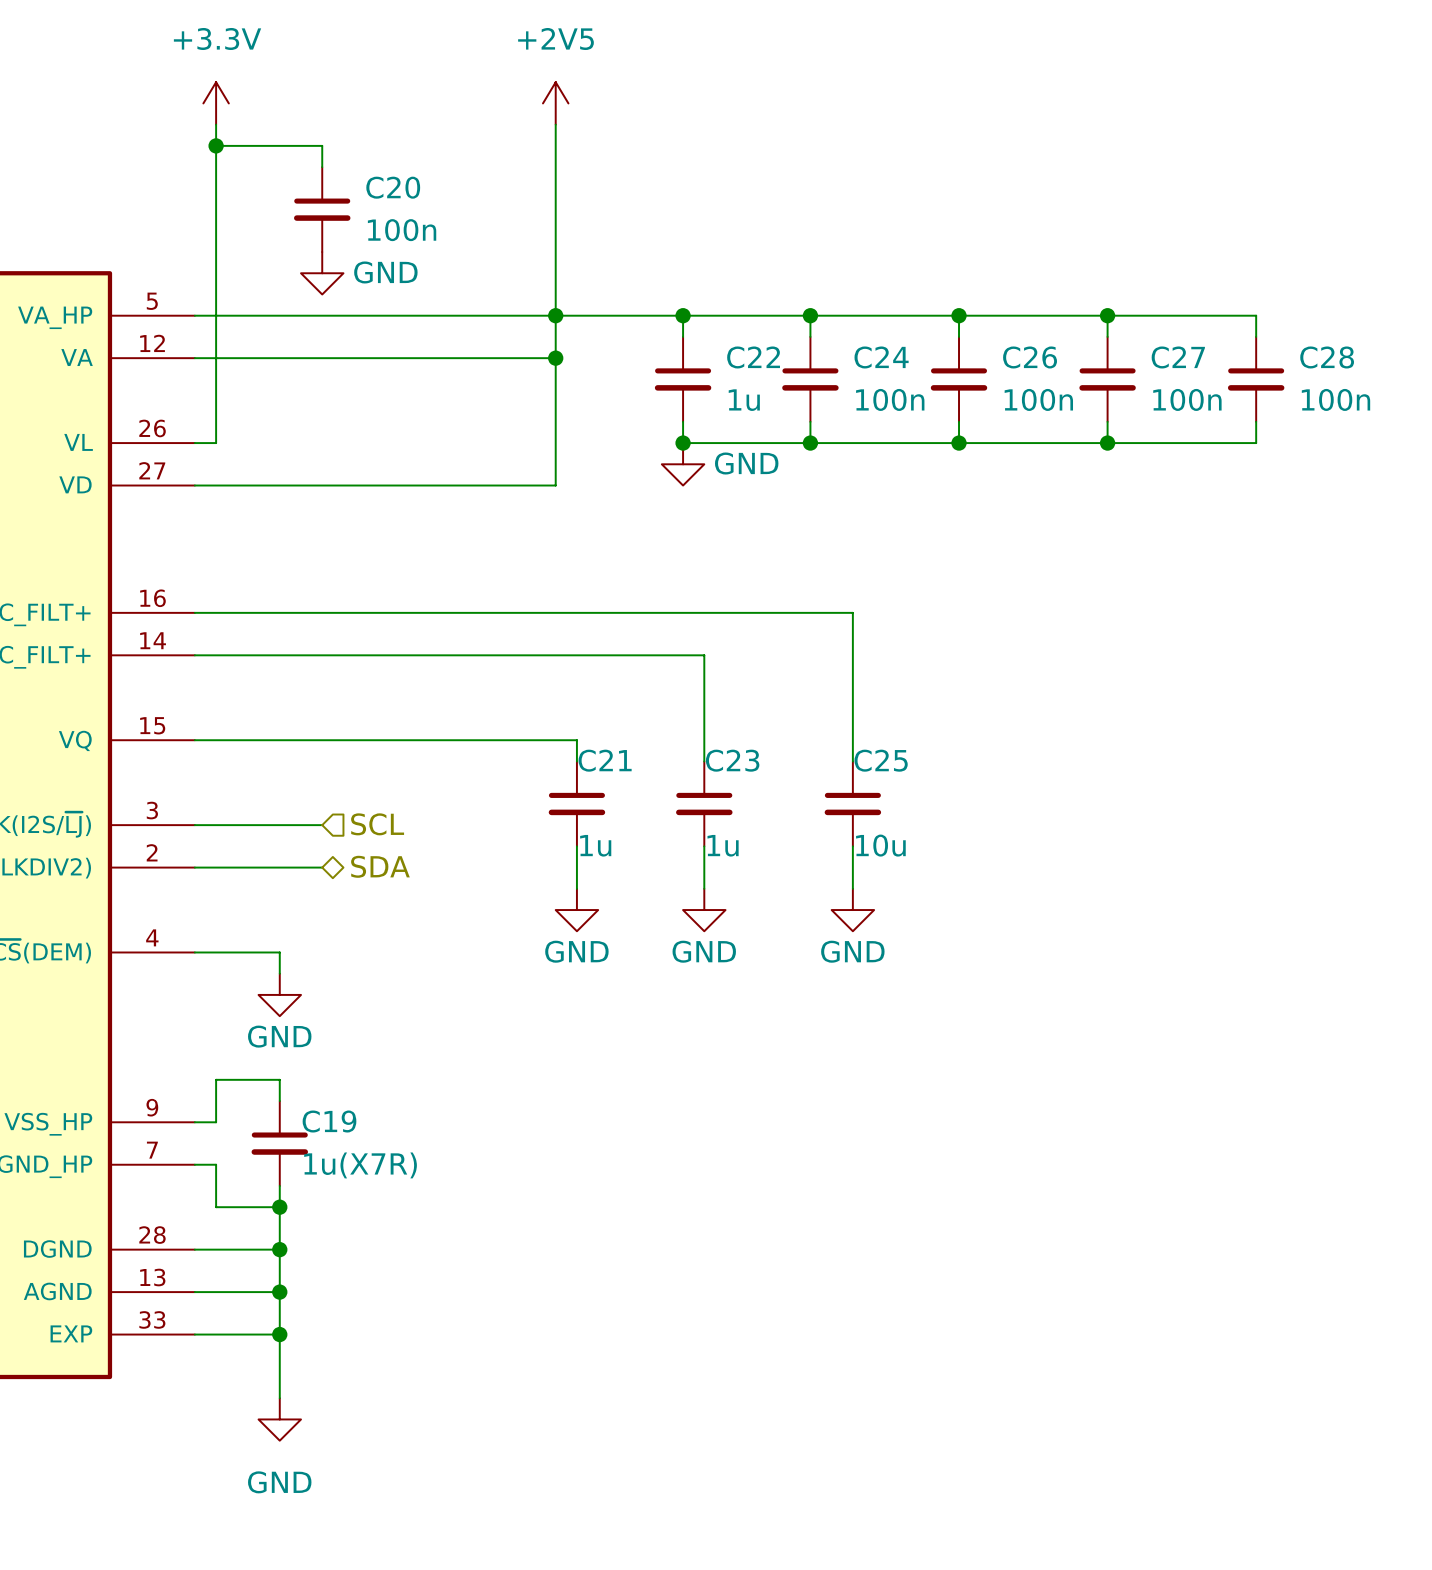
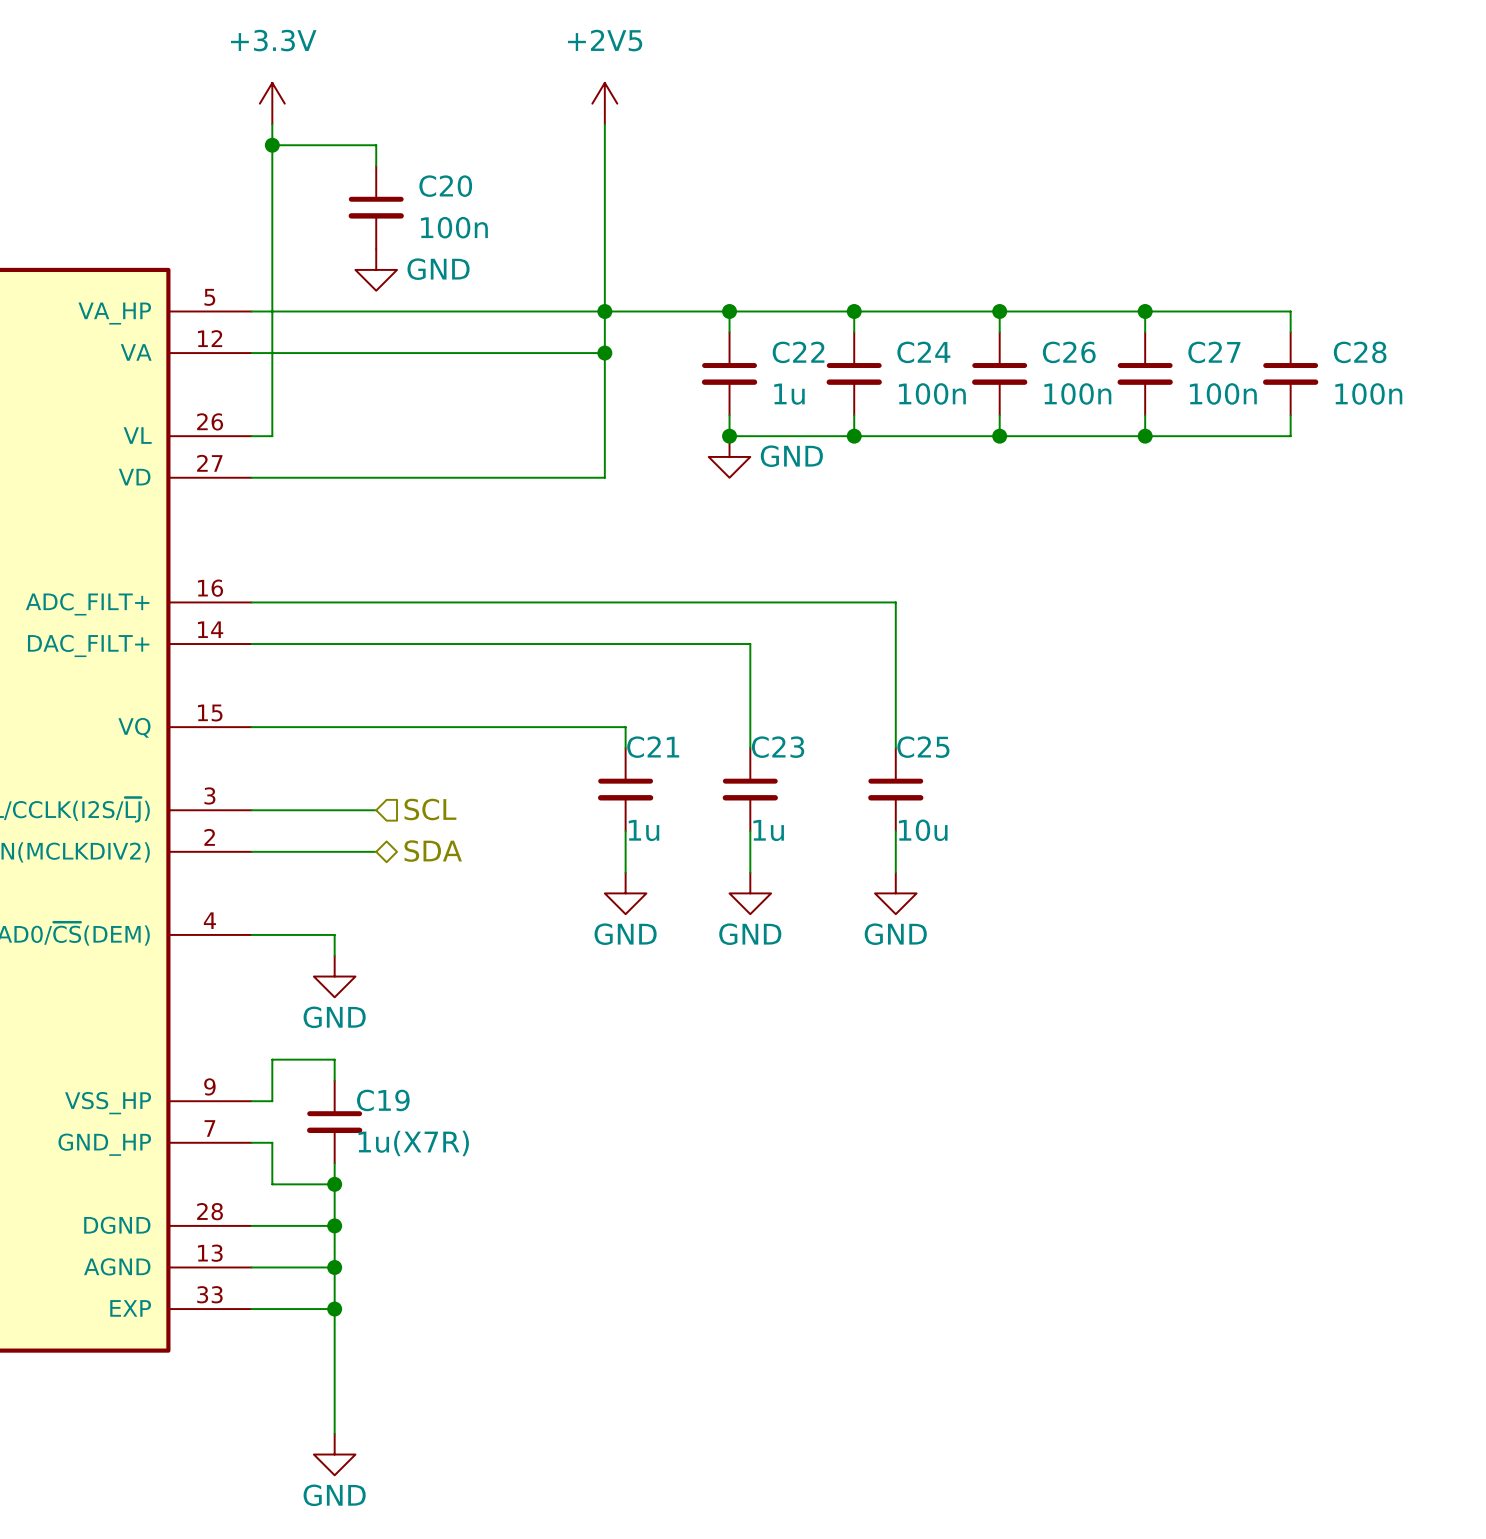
wire: none -> (334, 1371) (334, 1433)
power symbol position: GND (279, 1419) -> GND (334, 1454)
power symbol text position: GND (279, 1482) -> GND (334, 1495)

